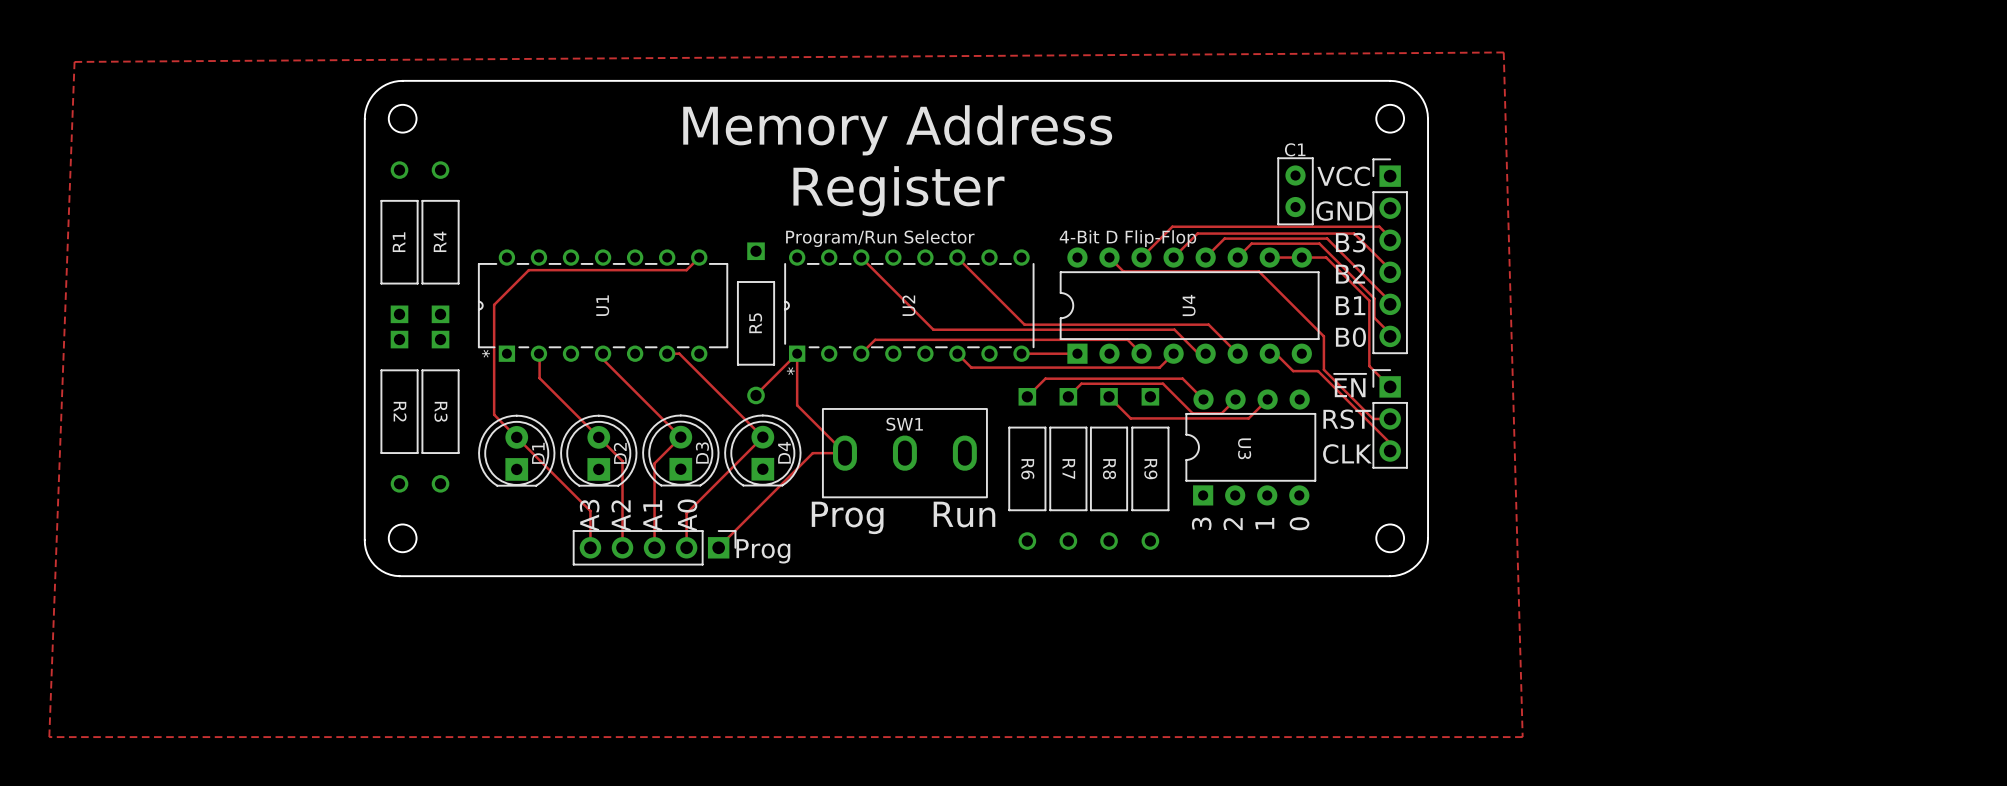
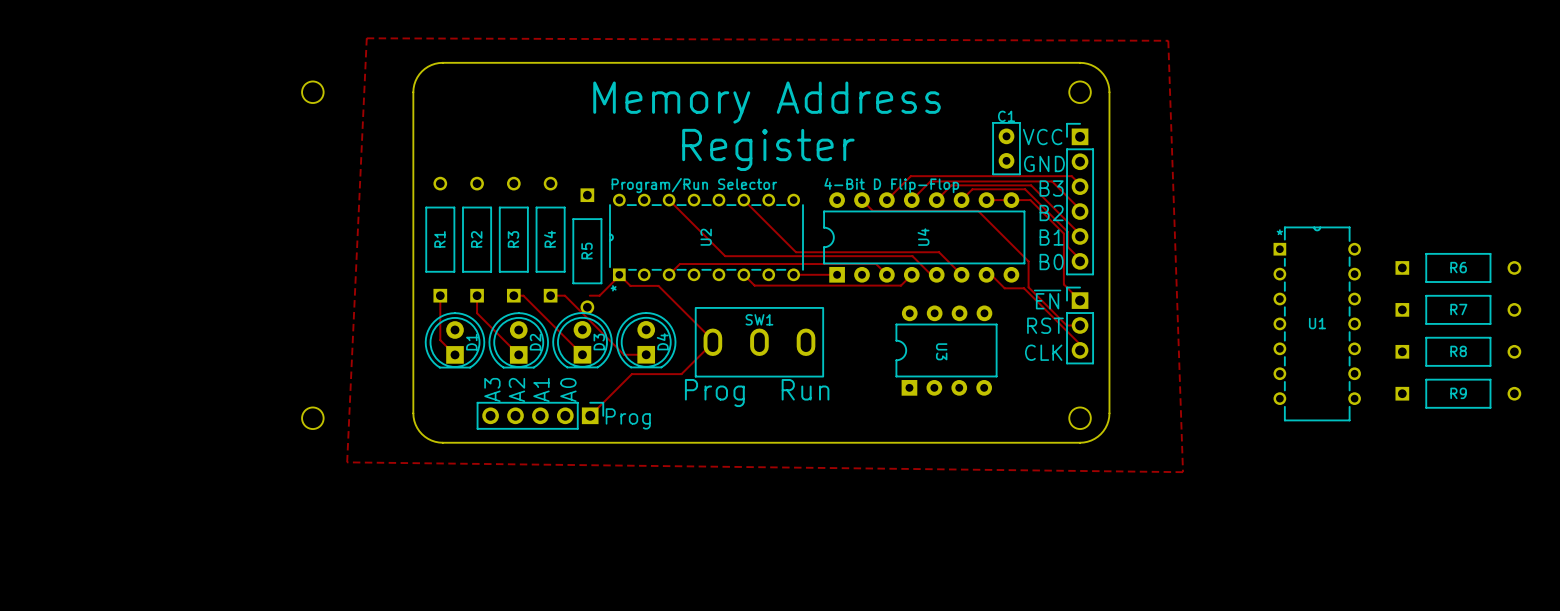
zone outline: (1503, 52) (74, 61) (49, 737) (1522, 737) (1503, 52) -> (366, 38) (347, 462) (1183, 472) (1168, 40) (366, 38)
board edge: (569, 80) (398, 81) (379, 89) (366, 106) (364, 118) (364, 539) (369, 557) (381, 571) (399, 576) (1390, 576) (1404, 573) (1420, 561) (1426, 548) (1428, 532) -> (442, 62) (431, 65) (421, 71) (415, 80) (413, 92) (413, 413) (417, 428) (428, 438) (442, 442) (1080, 442) (1091, 440) (1100, 434) (1107, 424) (1109, 413)
text position: Memory Address (897, 130) -> Memory Address (767, 102)
text position: Register (898, 191) -> Register (768, 149)
R1 position: (399, 242) -> (440, 239)
R4 position: (440, 242) -> (550, 239)
track: (699, 257) (686, 270) (528, 270) (494, 304) (494, 414) (590, 511) (590, 547) -> none
U1 rotation: 0° (603, 305) -> 90° clockwise (1317, 323)
U1 position: (603, 305) -> (1317, 323)
track: (539, 353) (539, 378) (622, 461) (622, 547) -> none
track: (603, 353) (603, 359) (680, 437) (654, 463) (654, 547) -> none
track: (667, 353) (679, 353) (762, 437) (686, 513) (686, 547) -> none
track: (797, 353) (756, 395) -> (619, 274) (630, 285) (658, 285) (713, 342) (681, 374) (631, 374) (590, 415)
track: (797, 355) (797, 405) (844, 453) (812, 453) (718, 547) -> (619, 275) (599, 295) (589, 295)
track: none -> (440, 295) (440, 340) (455, 354)
track: none -> (477, 295) (477, 313) (518, 354)
track: none -> (513, 295) (523, 295) (582, 354)
track: none -> (550, 295) (564, 295) (624, 354) (646, 354)
track: (1027, 396) (1045, 378) (1182, 378) (1203, 399) -> none
track: (1068, 396) (1081, 383) (1163, 383) (1192, 413) (1221, 413) (1235, 399) -> none
track: (1109, 396) (1130, 418) (1248, 418) (1267, 399) -> none
R2 rotation: 0° (399, 411) -> 180° (477, 239)
R2 position: (399, 411) -> (477, 239)
R3 rotation: 0° (440, 411) -> 180° (513, 239)
R3 position: (440, 411) -> (513, 239)
U3 position: (1250, 447) -> (946, 350)
D1 position: (516, 450) -> (455, 340)
D2 position: (598, 450) -> (518, 340)
D3 position: (680, 450) -> (582, 340)
D4 position: (762, 450) -> (646, 340)
SW1 position: (904, 453) -> (759, 342)
R6 rotation: 0° (1027, 468) -> 90° counterclockwise (1458, 267)
R6 position: (1027, 468) -> (1458, 267)
R7 rotation: 0° (1068, 468) -> 90° counterclockwise (1458, 309)
R7 position: (1068, 468) -> (1458, 309)
R8 rotation: 0° (1109, 468) -> 90° counterclockwise (1458, 351)
R8 position: (1109, 468) -> (1458, 351)
R9 rotation: 0° (1150, 468) -> 90° counterclockwise (1458, 393)
R9 position: (1150, 468) -> (1458, 393)
text position: Run (964, 514) -> Run (805, 389)
text position: A3 (589, 515) -> A3 (492, 389)
text position: A1 (652, 515) -> A1 (541, 389)
text position: A0 (687, 515) -> A0 (568, 389)
text position: A2 (621, 516) -> A2 (516, 389)
text position: Prog (847, 517) -> Prog (714, 393)
text: 3 (1201, 523) -> none
text: 1 (1264, 523) -> none
text: 0 (1299, 523) -> none
text: 2 (1233, 524) -> none
part position: (654, 547) -> (540, 415)
text position: Prog (763, 551) -> Prog (628, 418)

